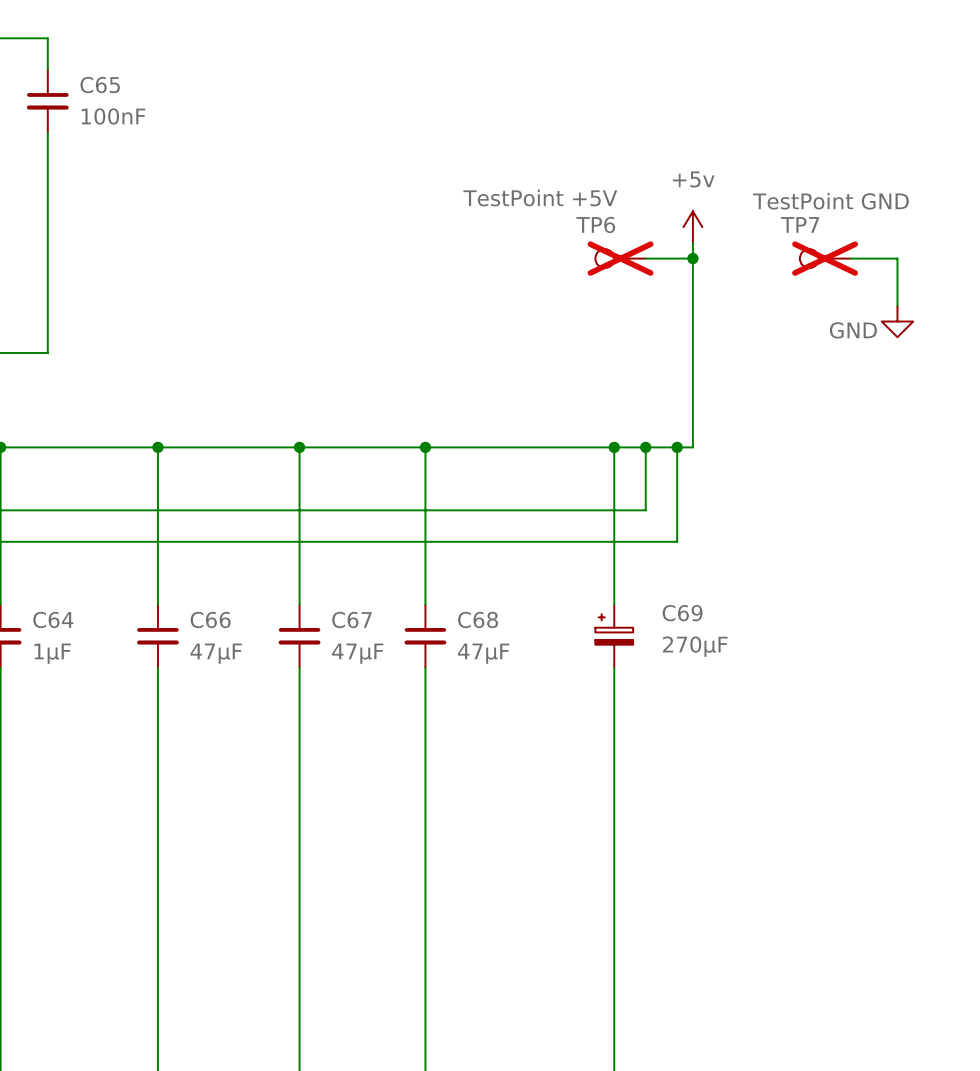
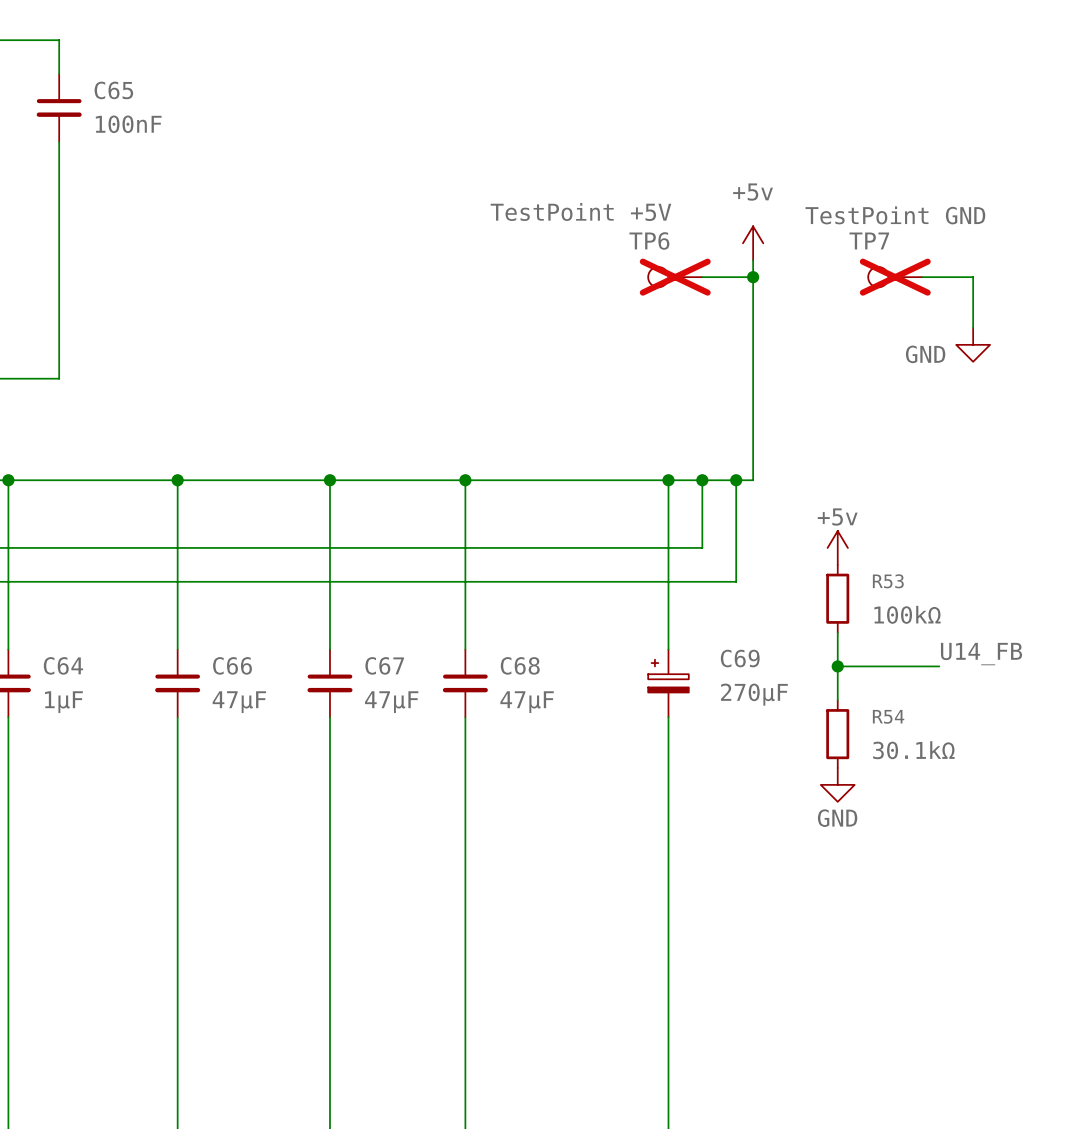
power symbol: none -> +5v (837, 547)
R53: none -> 100kΩ (837, 598)
wire: none -> (837, 632) (837, 700)
label: none -> U14_FB (981, 654)
wire: none -> (837, 666) (939, 666)
junction: none -> (837, 666)
R54: none -> 30.1kΩ (837, 734)
power symbol: none -> GND (837, 784)

